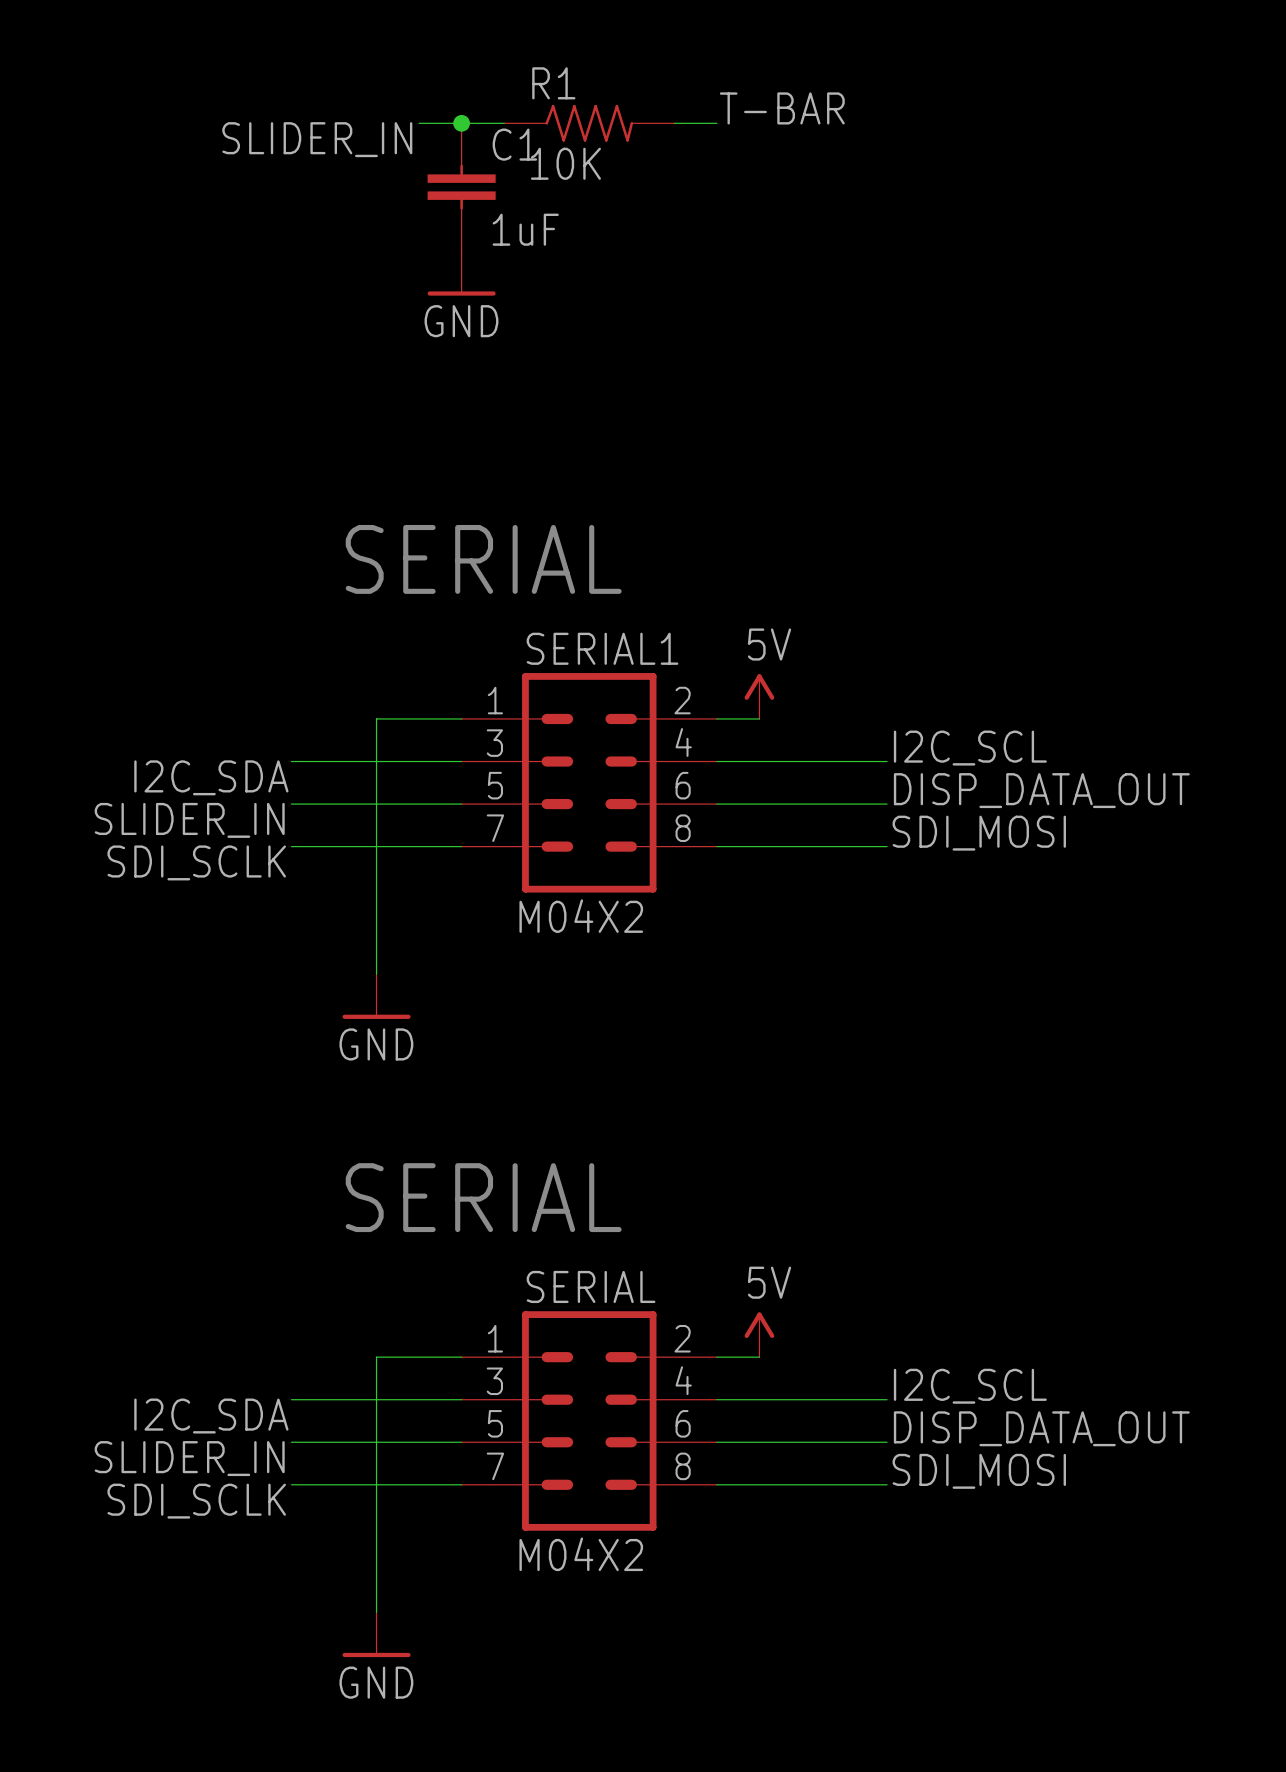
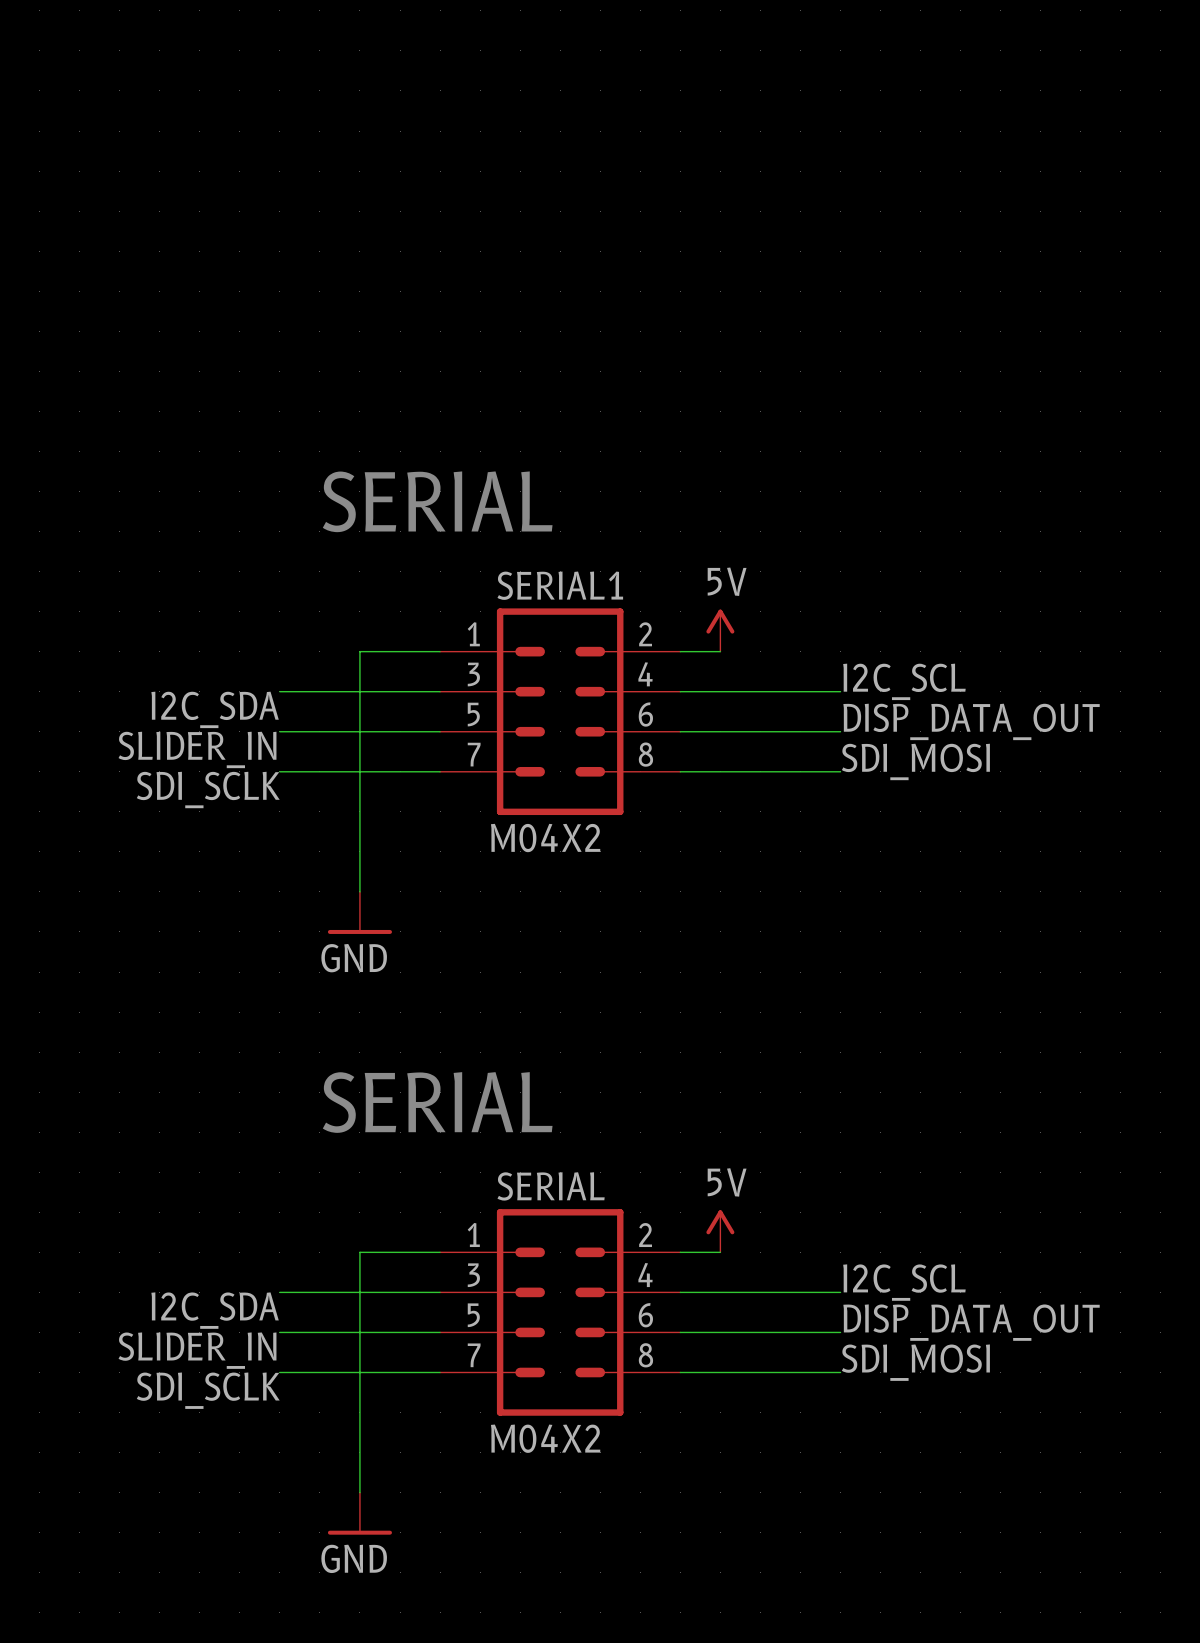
label: T-BAR (782, 108) -> none
wire: (419, 123) (504, 123) -> none
junction: (461, 123) -> none
R1: 10K (589, 123) -> none
wire: (674, 123) (716, 123) -> none
label: SLIDER_IN (317, 139) -> none
C1: 1uF (461, 187) -> none
power symbol: GND (461, 273) -> none

